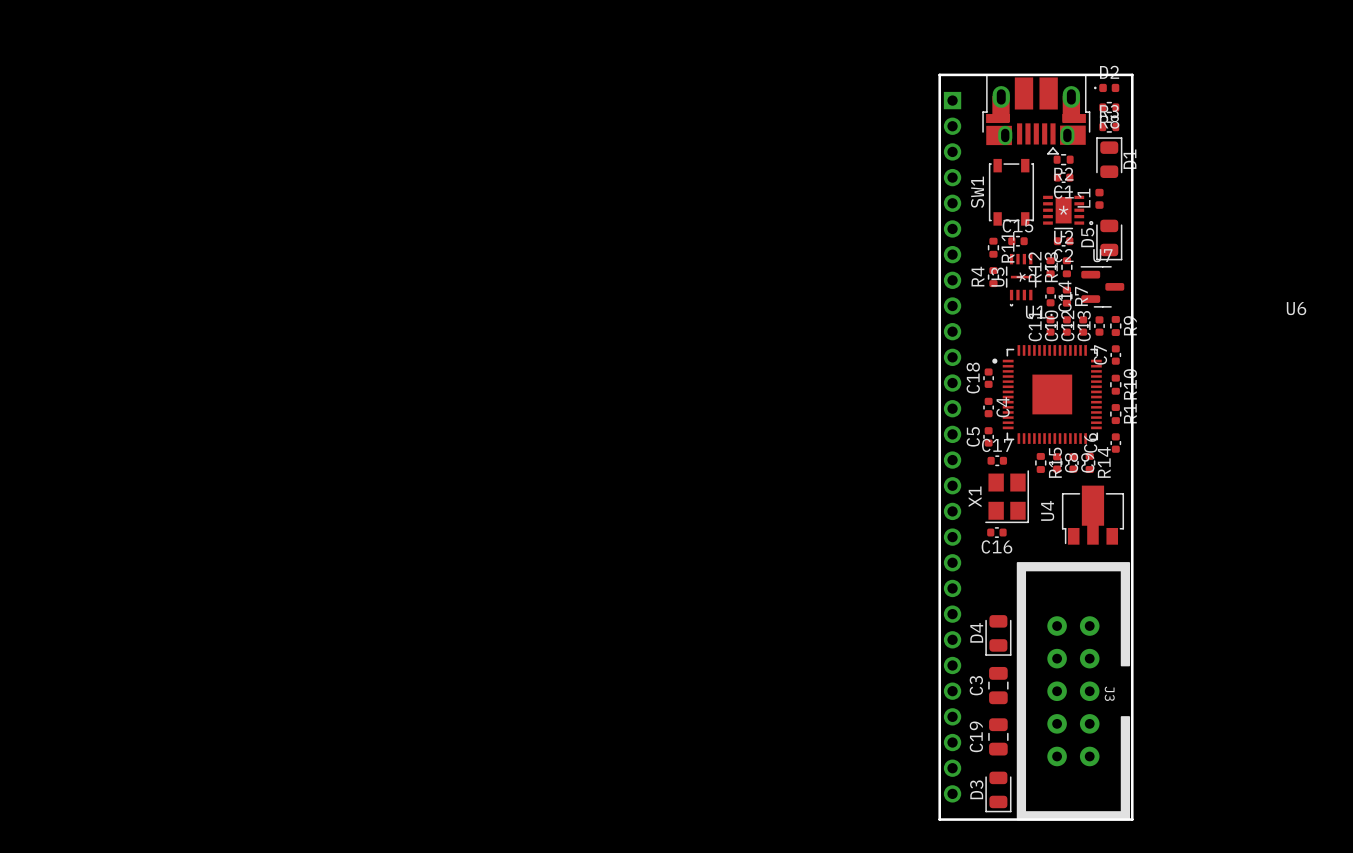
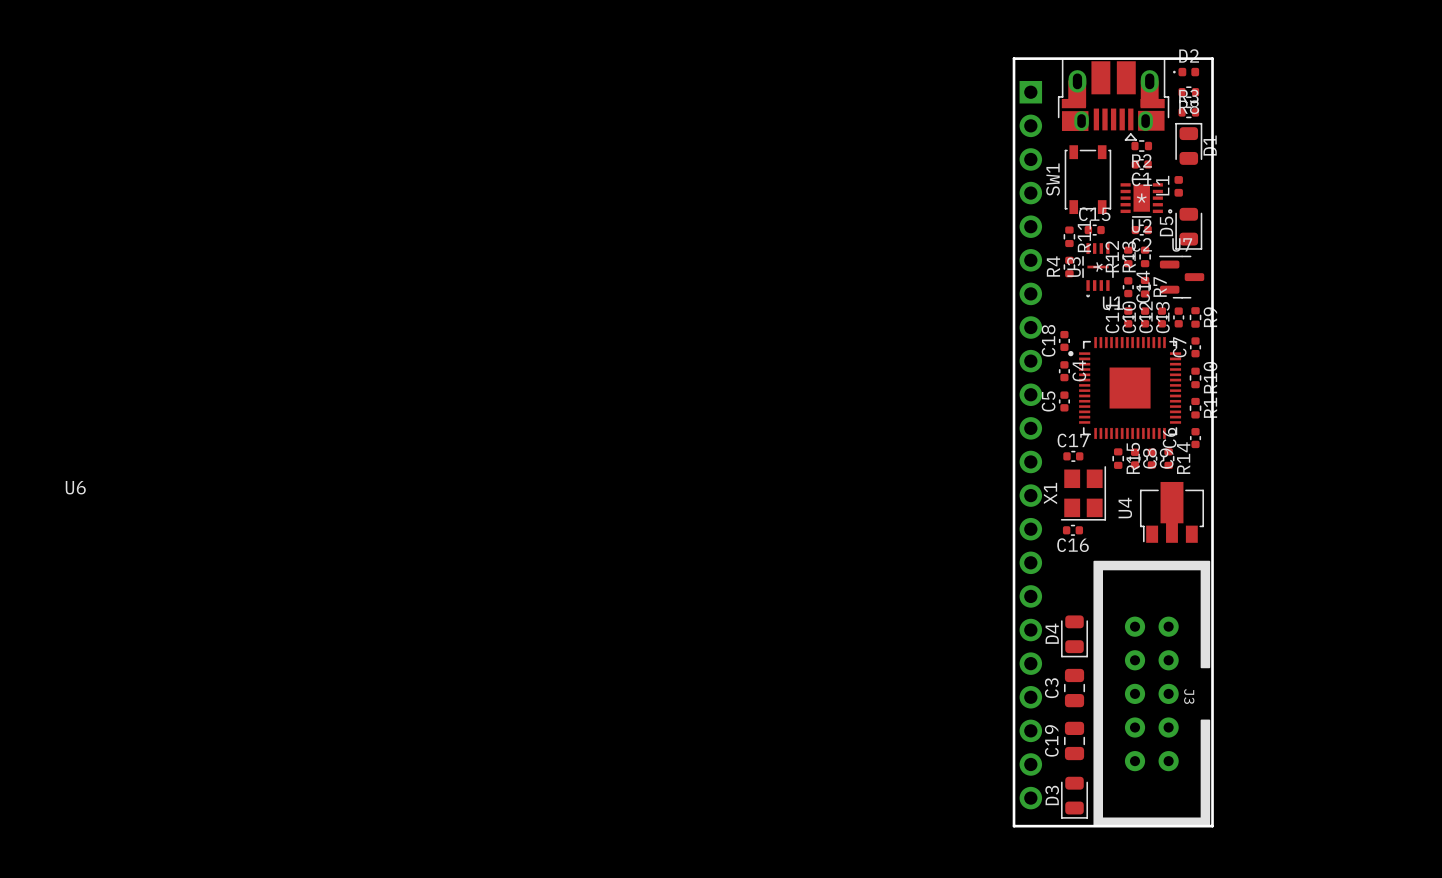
part footprint: [943, 91, 962, 803] -> [1019, 80, 1043, 810]
U6 position: (1296, 308) -> (75, 487)
C18: none -> (1064, 340)
C18 name: C18 (973, 378) -> C4 (1079, 370)
C4 name: C4 (1003, 407) -> C5 (1048, 401)
C5: (988, 436) -> none

